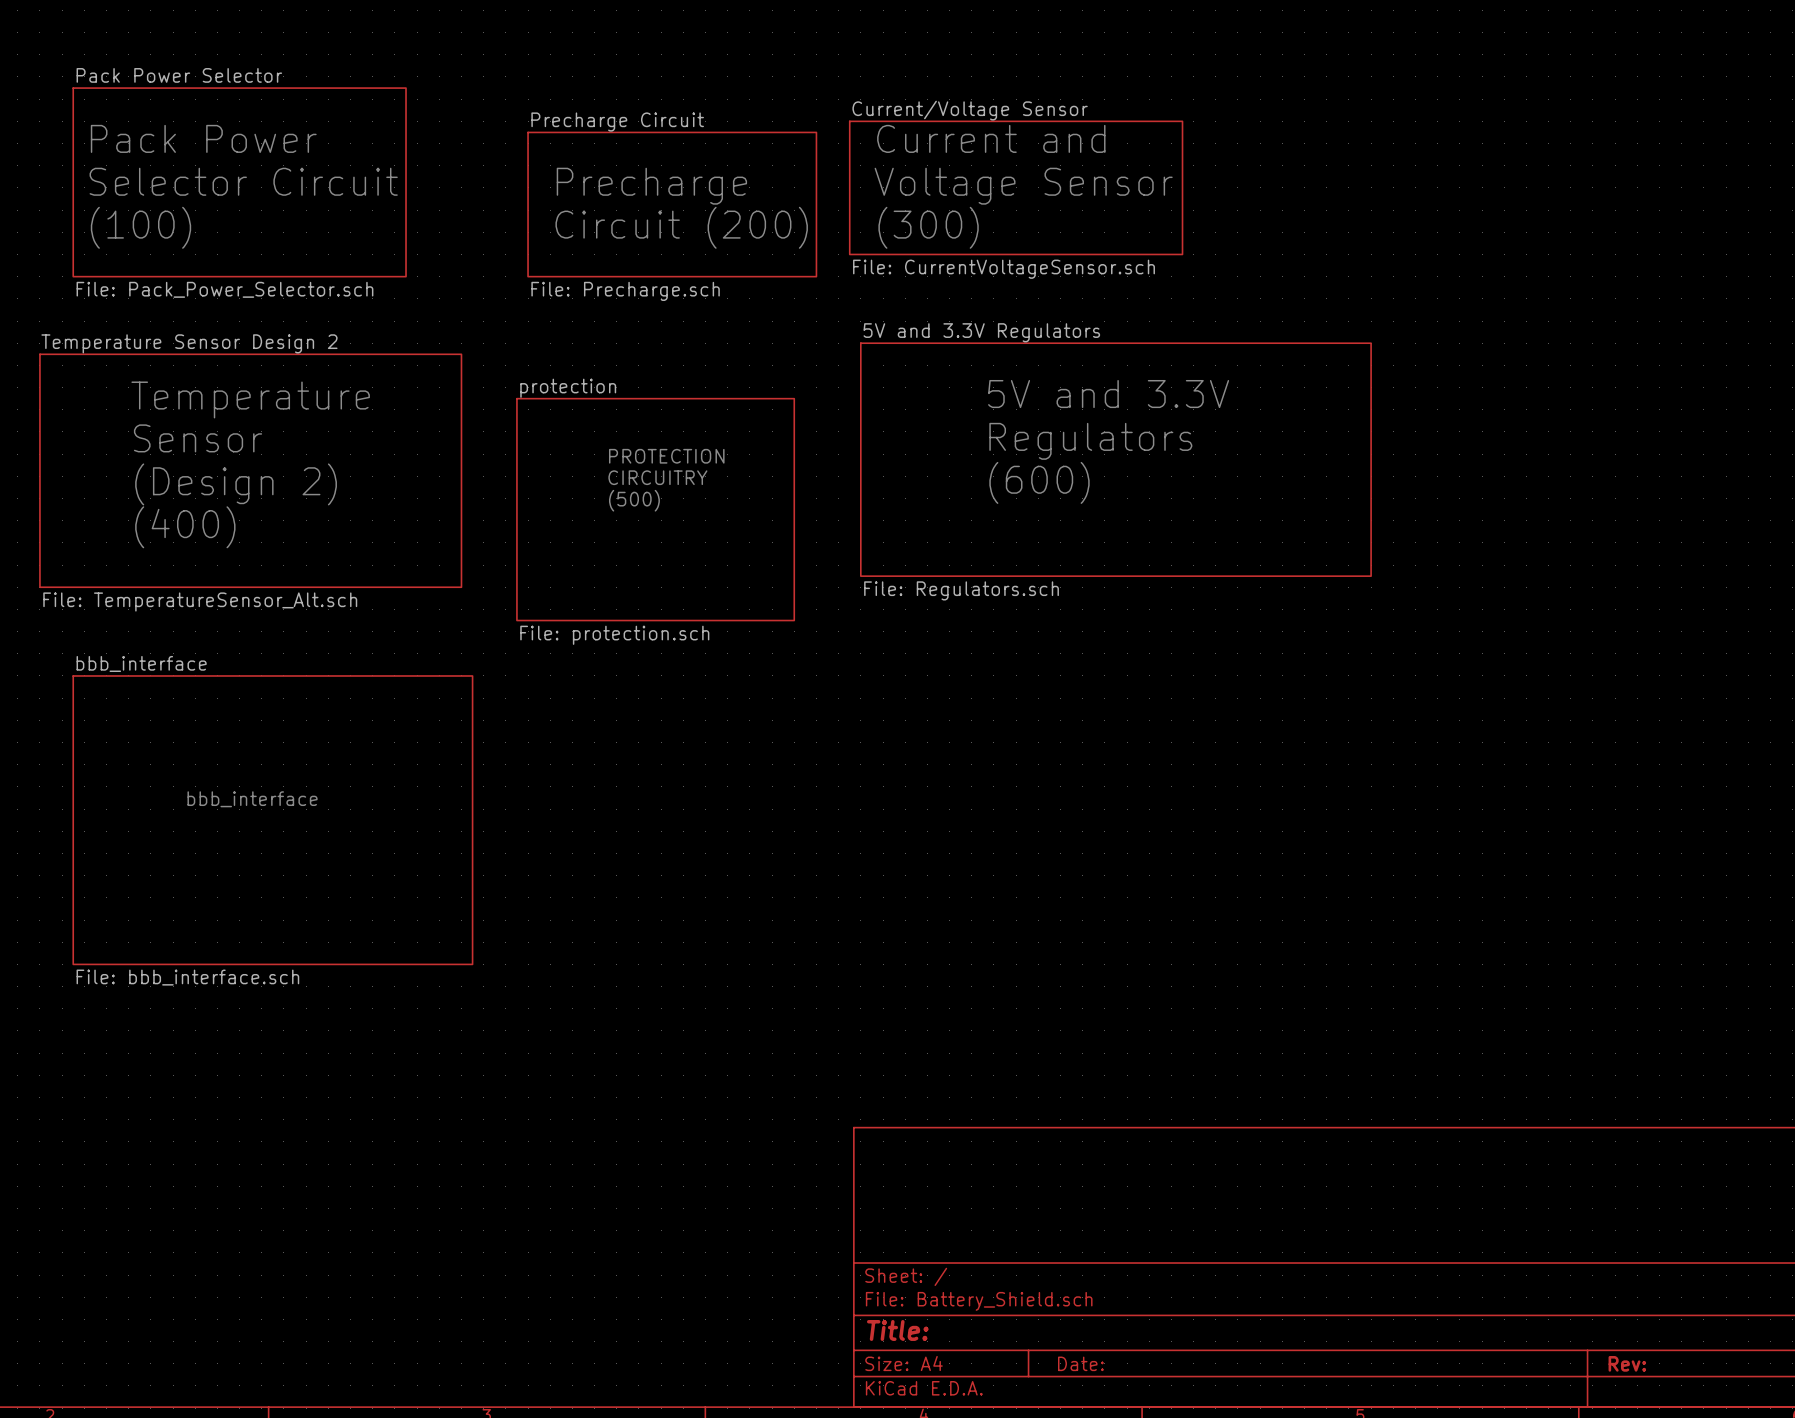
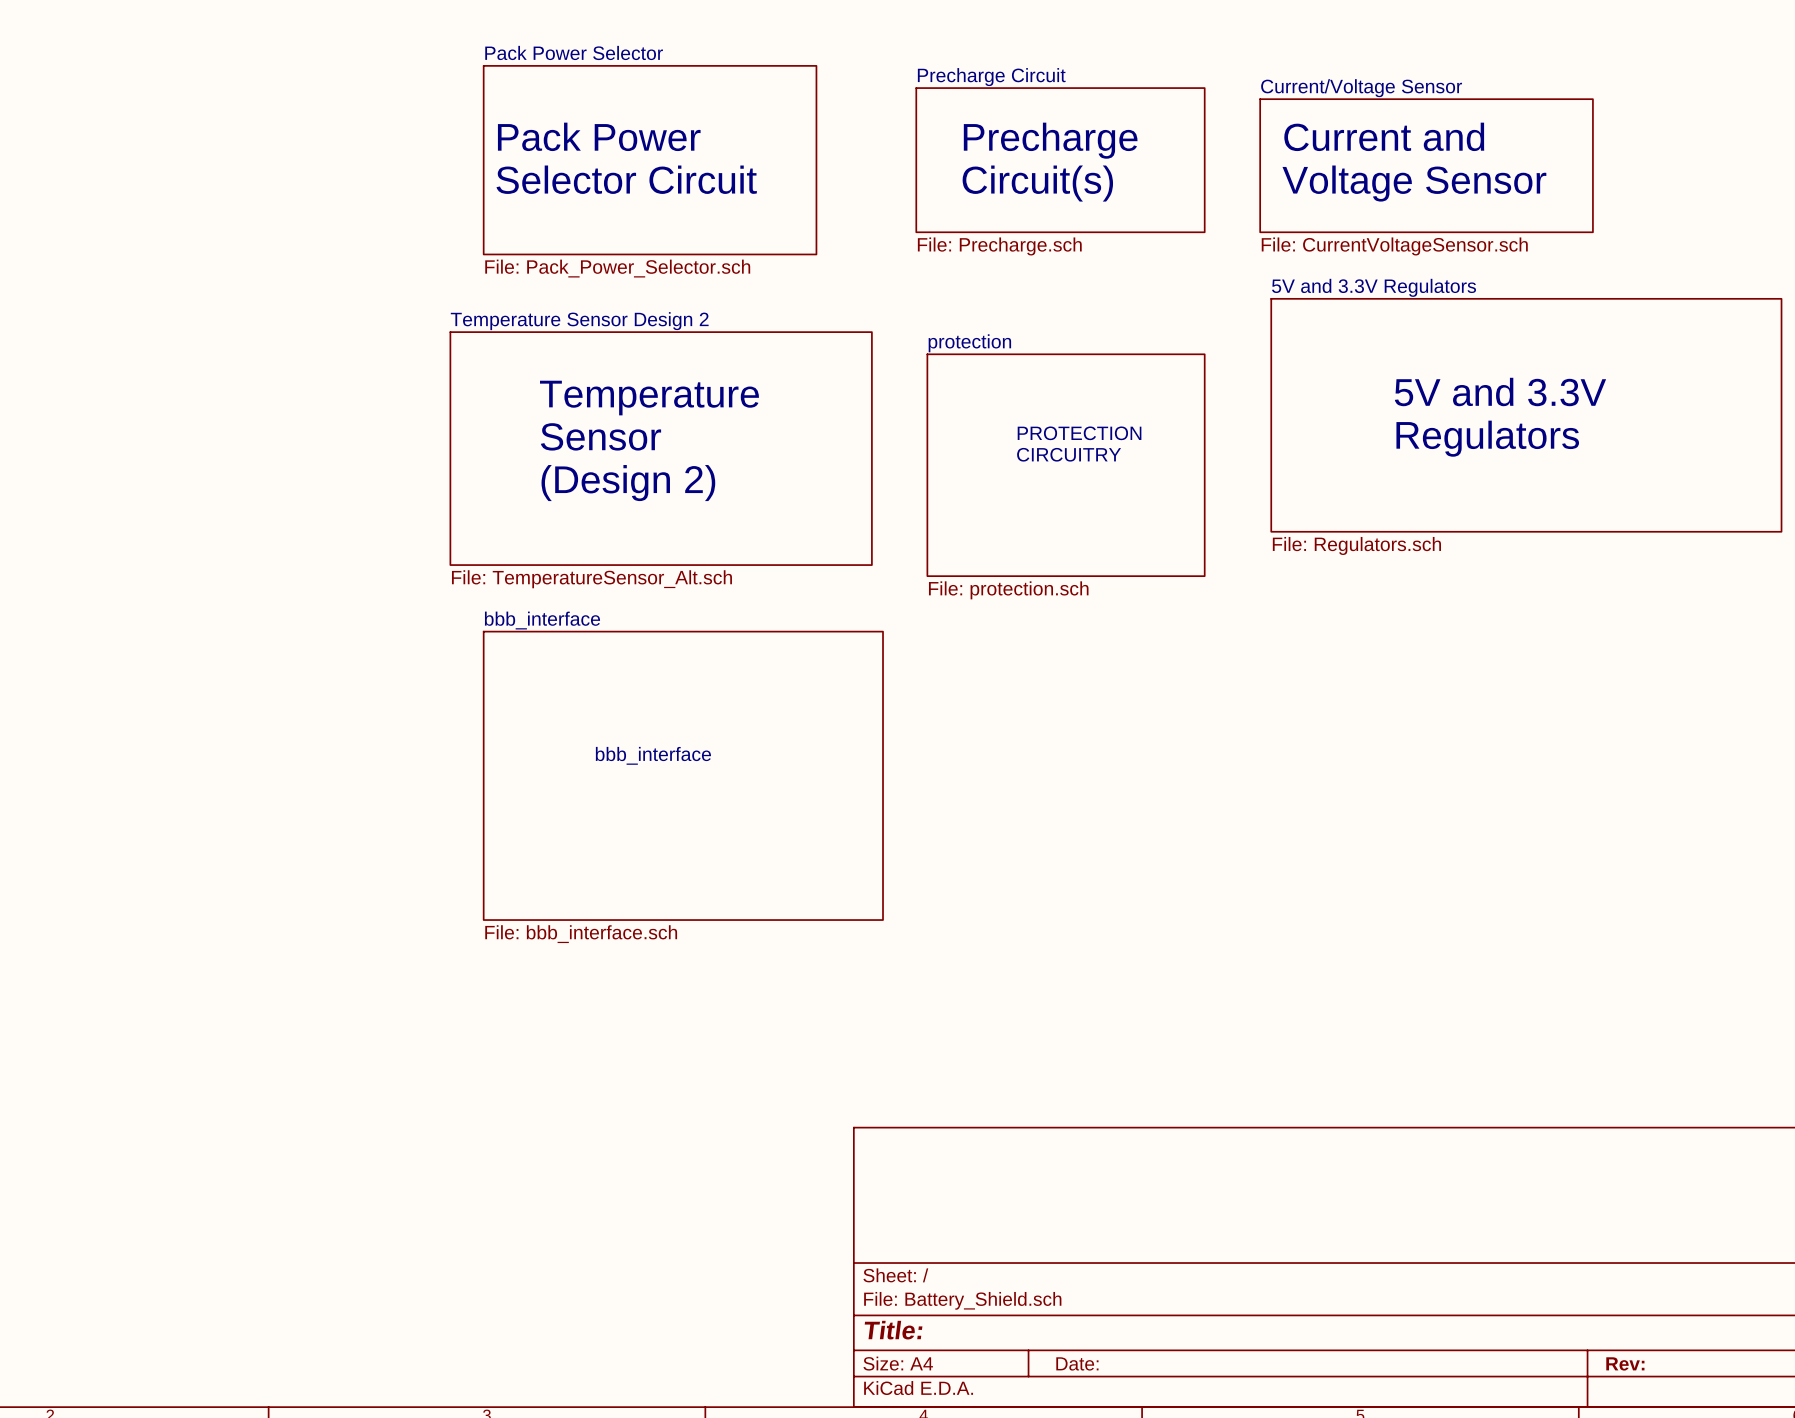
text: none -> Pack Power (599, 136)
text: none -> Current and (1384, 136)
text: Pack Power (203, 138) -> none
text: Current and (991, 138) -> none
text: none -> Precharge (1050, 140)
sheet Pack Power Selector: none -> File: Pack_Power_Selector.sch (650, 160)
sheet Precharge Circuit: none -> File: Precharge.sch (1060, 160)
sheet Current/Voltage Sensor: none -> File: CurrentVoltageSensor.sch (1426, 165)
text: none -> Selector Circuit (626, 179)
text: Selector Circuit (243, 181) -> none
sheet Pack Power Selector: File: Pack_Power_Selector.sch (239, 182) -> none
text: none -> Circuit(s) (1037, 183)
text: none -> Voltage Sensor (1414, 183)
text: Precharge (651, 186) -> none
text: Voltage Sensor (1023, 186) -> none
sheet Current/Voltage Sensor: File: CurrentVoltageSensor.sch (1016, 187) -> none
sheet Precharge Circuit: File: Precharge.sch (672, 204) -> none
text: (100) (140, 227) -> none
text: Circuit (200) (681, 227) -> none
text: (300) (928, 227) -> none
text: none -> 5V and 3.3V (1500, 391)
text: 5V and 3.3V (1108, 394) -> none
text: none -> Temperature (649, 398)
text: Temperature (250, 399) -> none
text: none -> PROTECTION (1079, 433)
text: none -> Sensor (600, 436)
text: Sensor (198, 438) -> none
text: none -> Regulators (1487, 438)
text: Regulators (1090, 441) -> none
text: none -> CIRCUITRY (1069, 454)
text: PROTECTION (666, 456) -> none
sheet 5V and 3.3V Regulators position: (1115, 459) -> (1526, 415)
sheet protection: none -> File: protection.sch (1066, 465)
sheet Temperature Sensor Design 2 position: (250, 470) -> (661, 448)
text: CIRCUITRY (657, 477) -> none
text: none -> (Design 2) (628, 483)
text: (600) (1039, 482) -> none
text: (Design 2) (236, 484) -> none
text: (500) (634, 500) -> none
sheet protection: File: protection.sch (655, 509) -> none
text: (400) (185, 527) -> none
text: none -> bbb_interface (653, 755)
sheet bbb_interface: none -> File: bbb_interface.sch (683, 775)
text: bbb_interface (252, 799) -> none
sheet bbb_interface: File: bbb_interface.sch (272, 820) -> none

